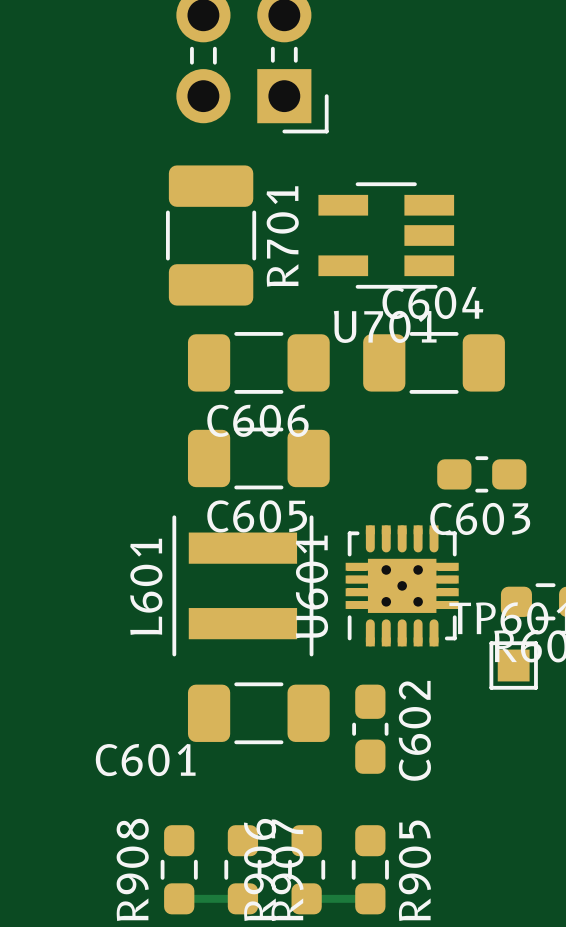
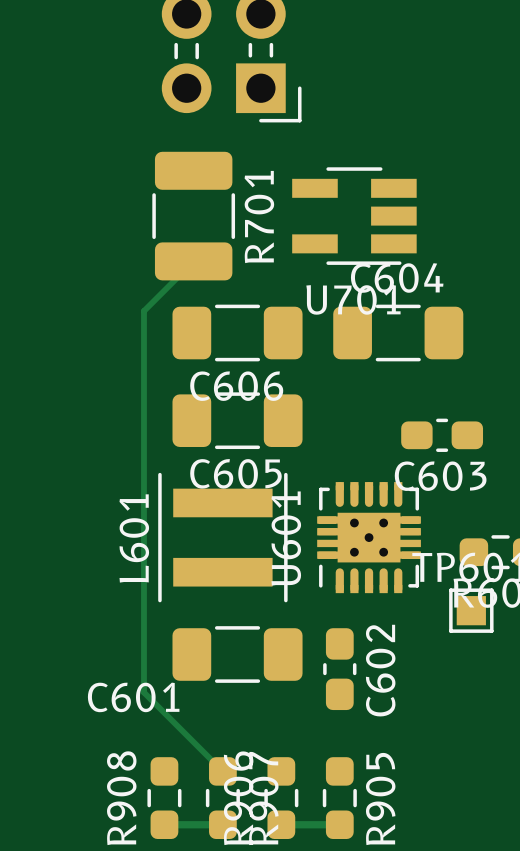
track: none -> (193, 261) (143, 311) (143, 692) (222, 771)

